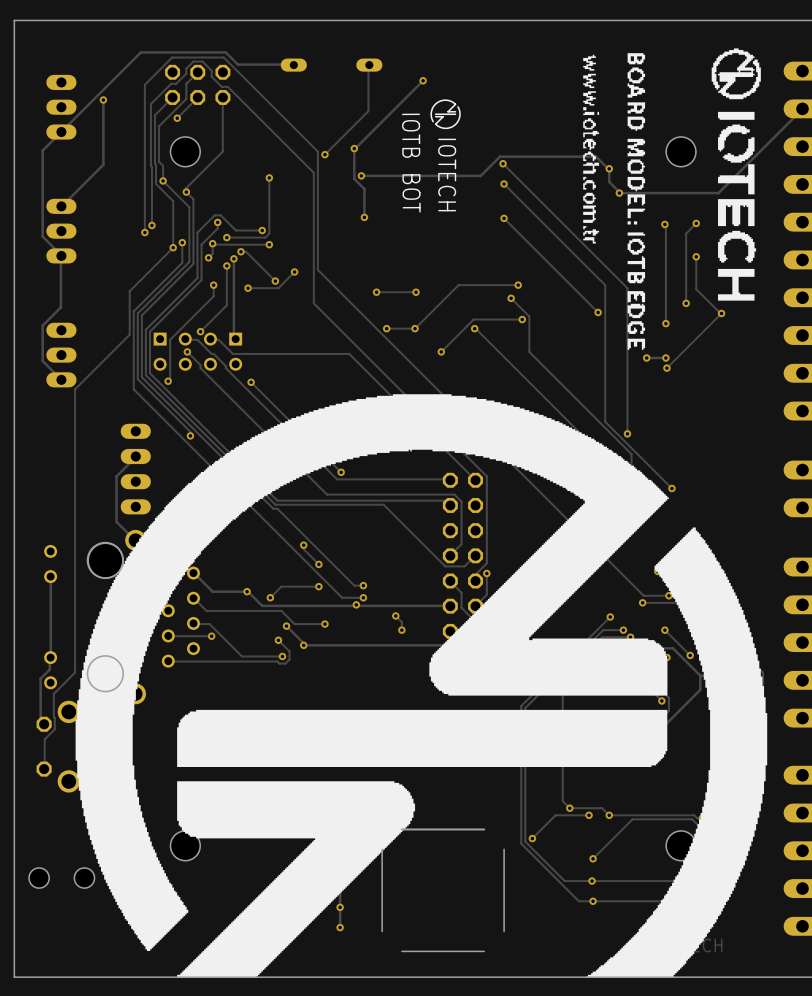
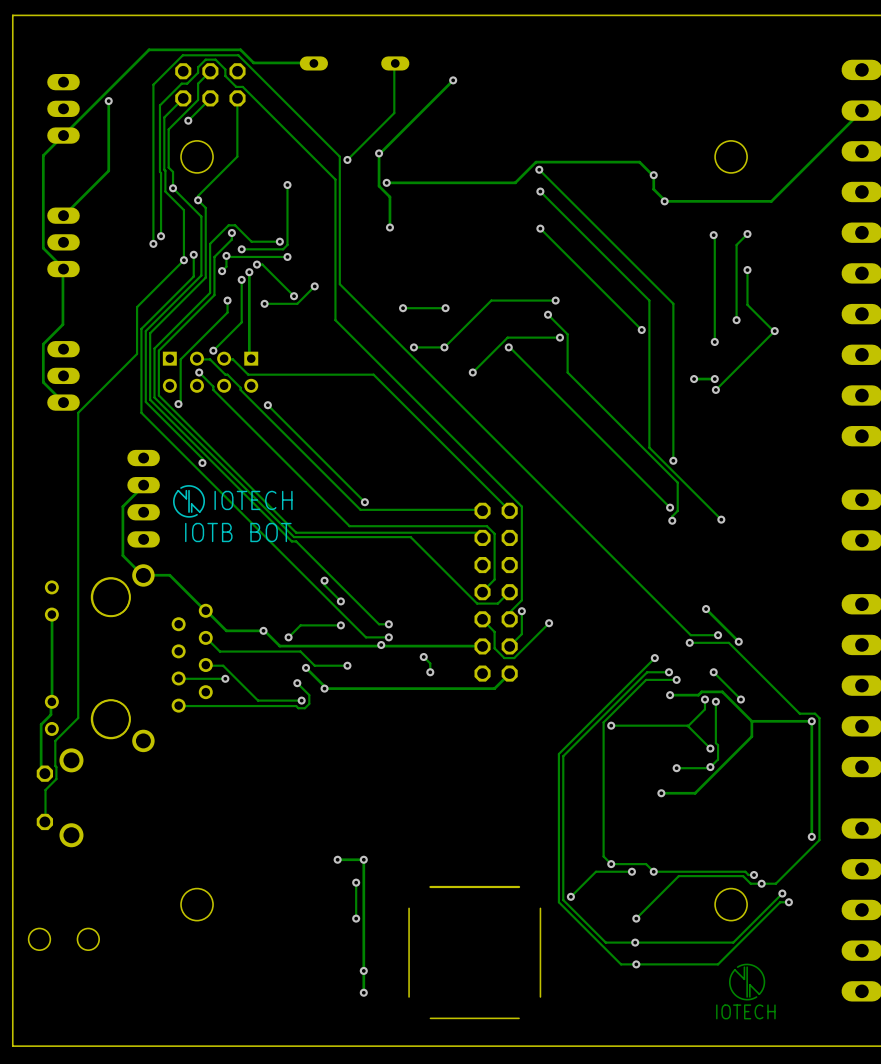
drawing: [711, 48, 761, 100] -> none
drawing: [627, 53, 646, 350] -> none
drawing: [583, 54, 600, 244] -> none
line: (457, 106) (459, 118) (451, 127) (444, 128) (438, 126) (435, 124) (443, 116) (435, 116) -> none
line: (455, 111) (448, 111) (455, 104) (452, 102) (446, 100) (439, 101) (431, 110) (433, 121) -> none
drawing: [718, 111, 757, 301] -> none
line: (455, 114) (435, 114) -> none
text: IOTB BOT (411, 163) -> none
text: IOTECH (447, 175) -> none
drawing: [75, 394, 669, 952] -> none
line: none -> (181, 488) (193, 486) (202, 494) (204, 502) (201, 509) (199, 512) (191, 504) (191, 512)
line: none -> (186, 490) (186, 498) (178, 490) (176, 493) (173, 500) (175, 507) (184, 516) (197, 514)
line: none -> (189, 490) (189, 512)
text: none -> IOTECH (253, 500)
text: none -> IOTB BOT (238, 532)
drawing: [586, 527, 768, 978] -> none
drawing: [177, 709, 668, 768] -> none
drawing: [177, 781, 416, 978] -> none

